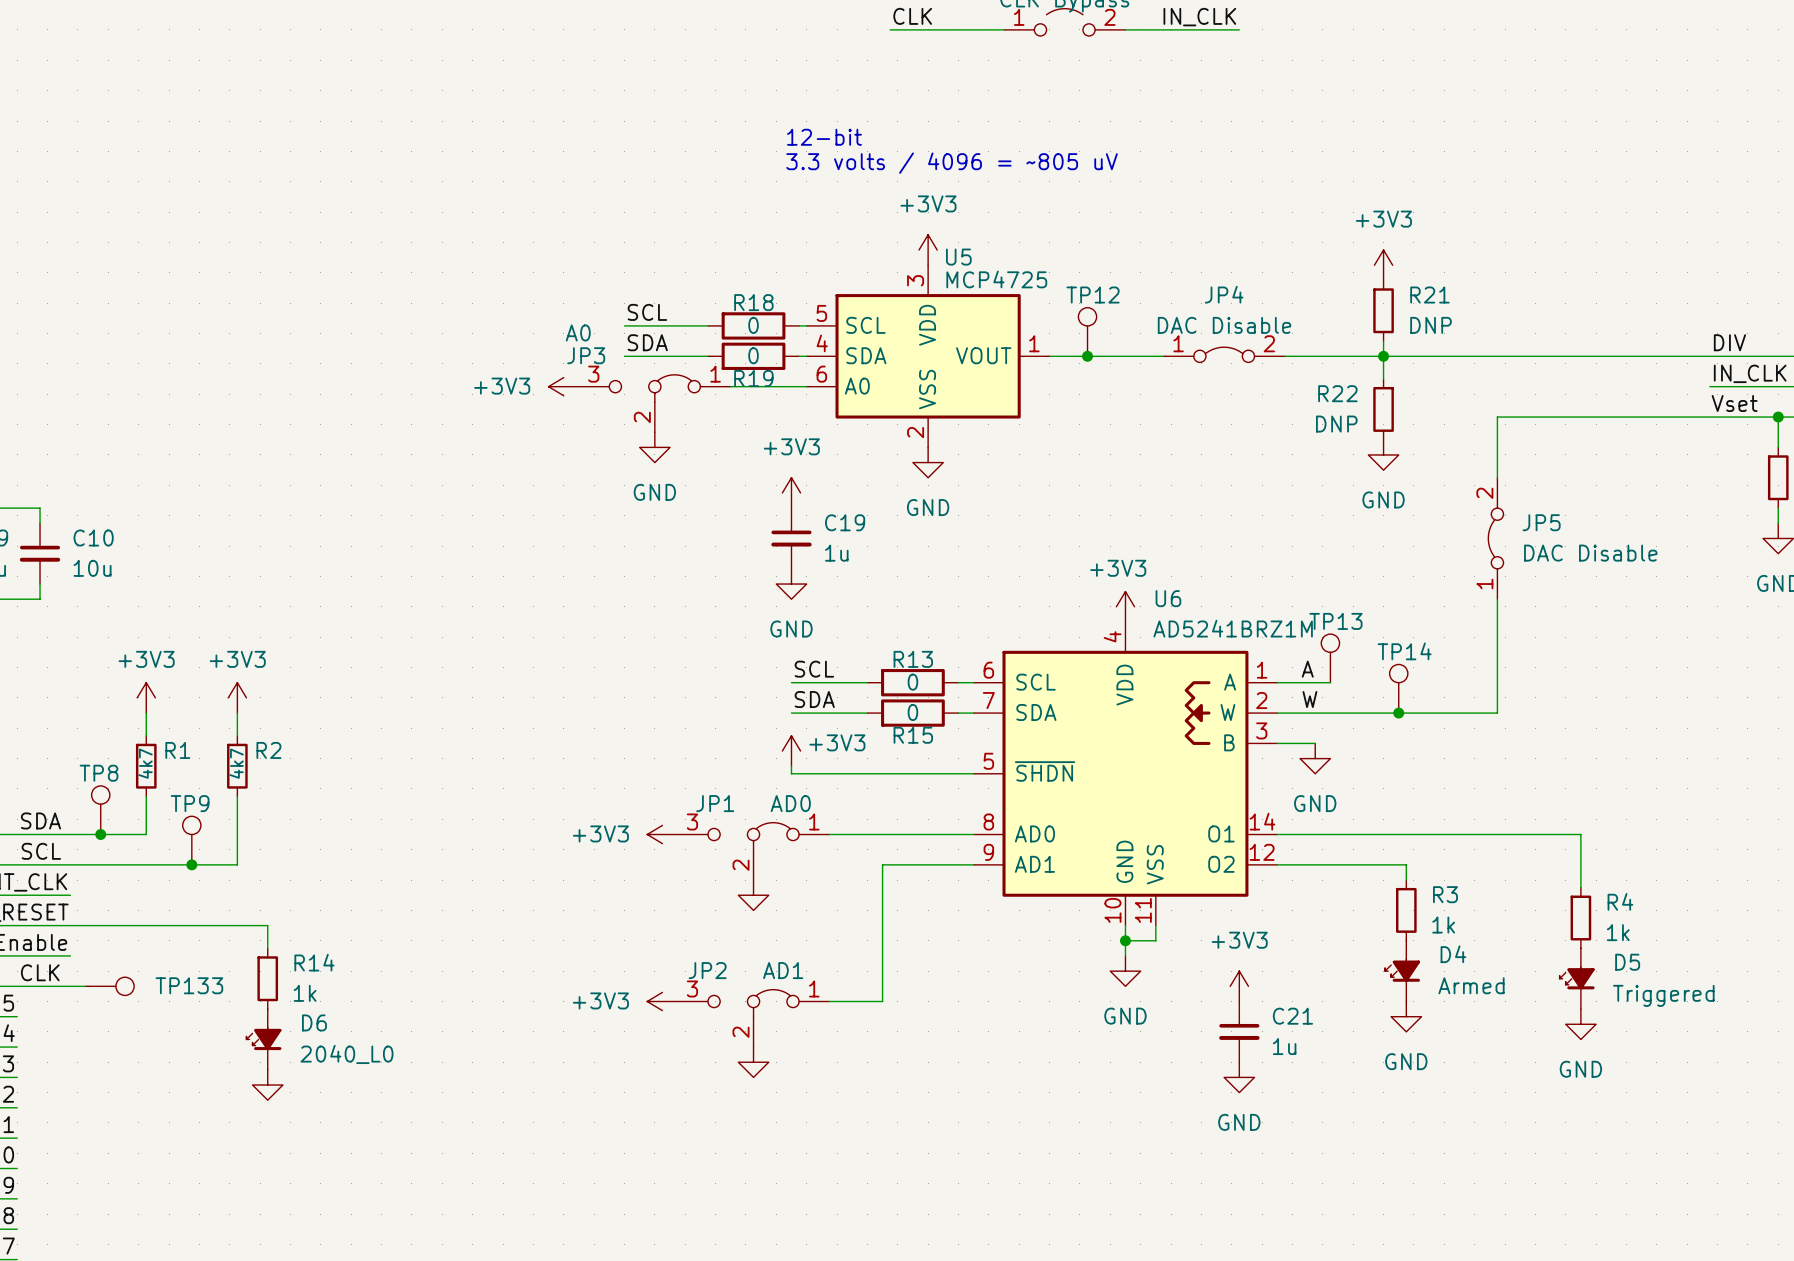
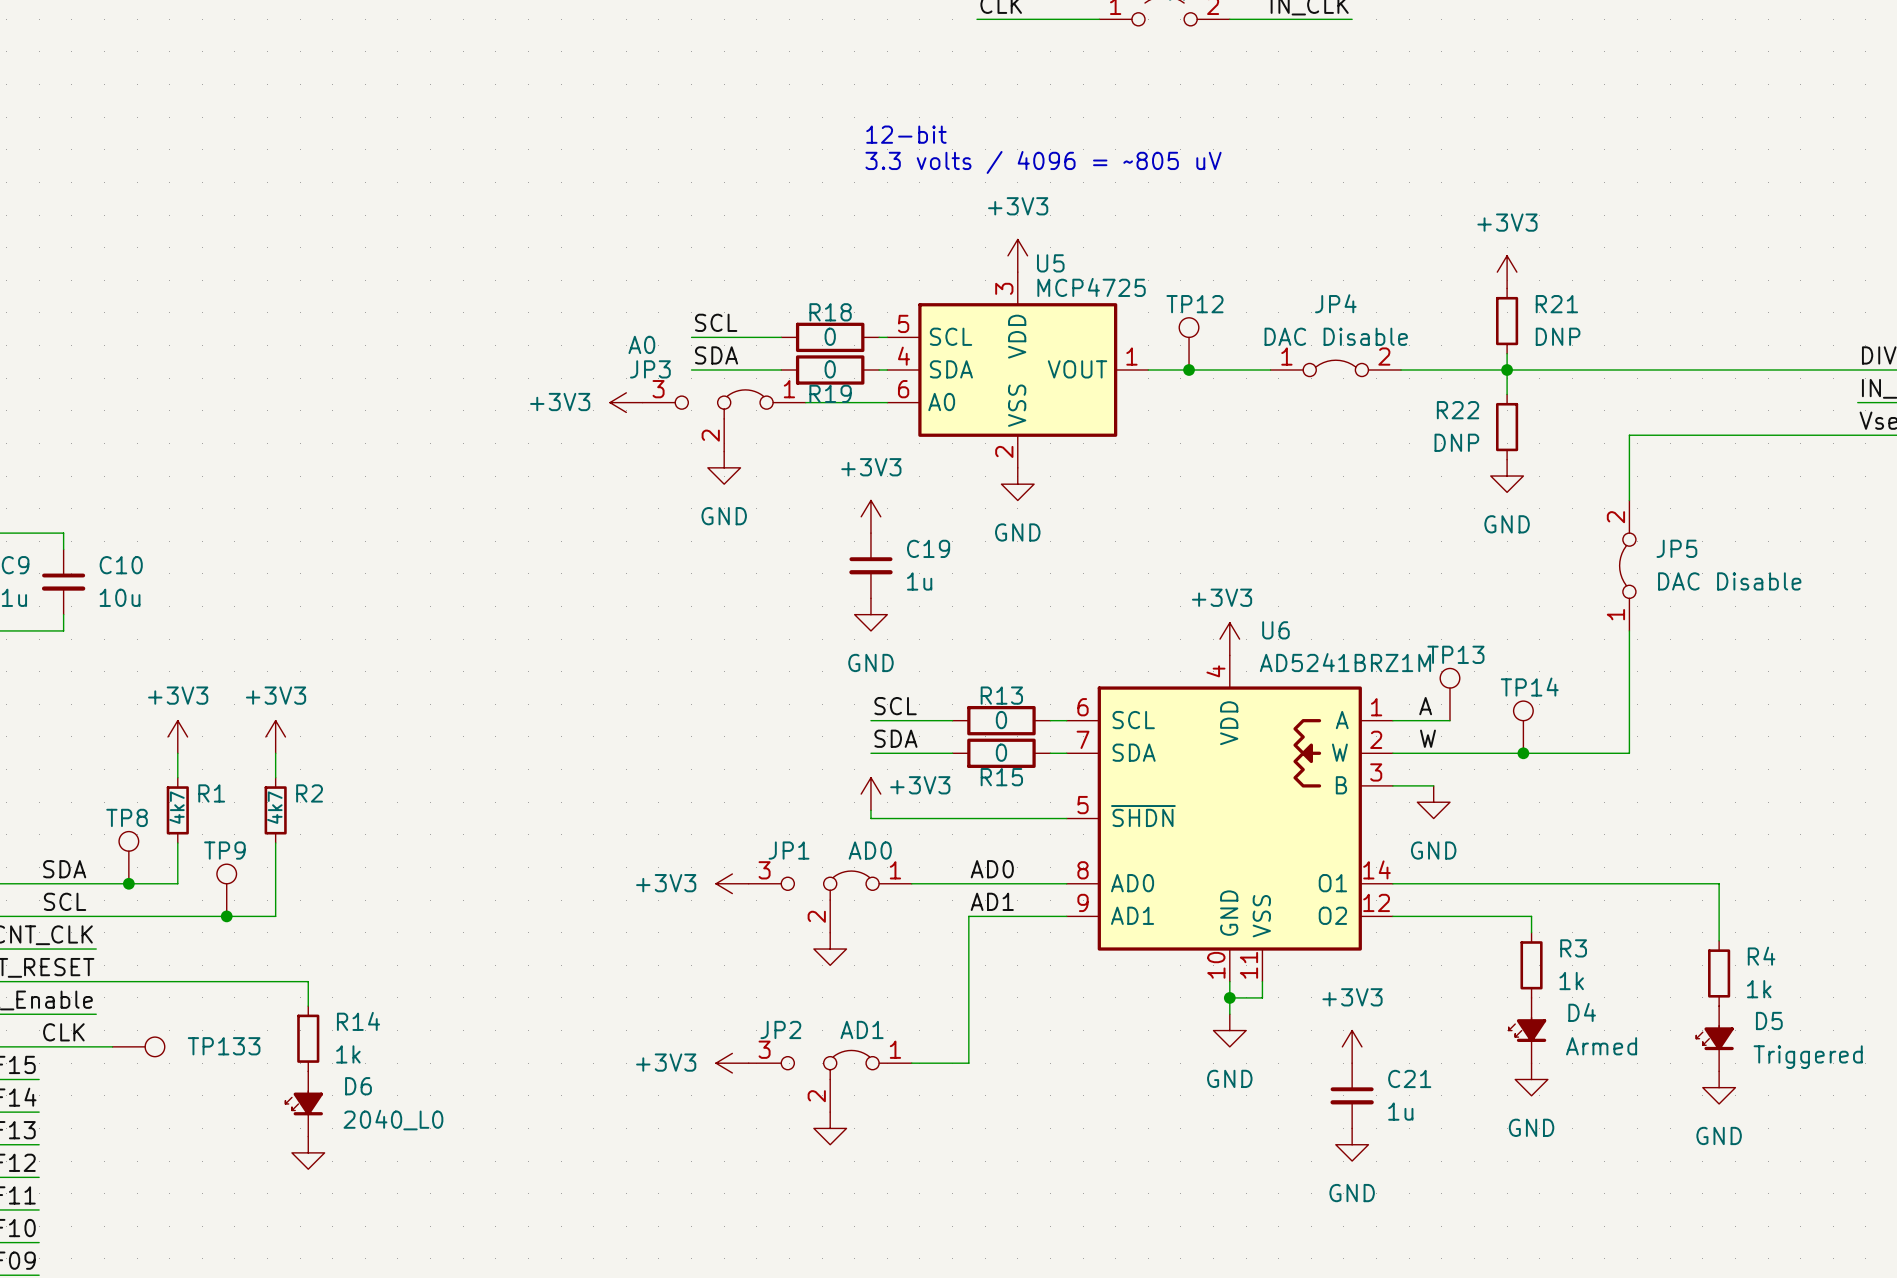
label: none -> AD0 (992, 869)
label: none -> AD1 (992, 901)

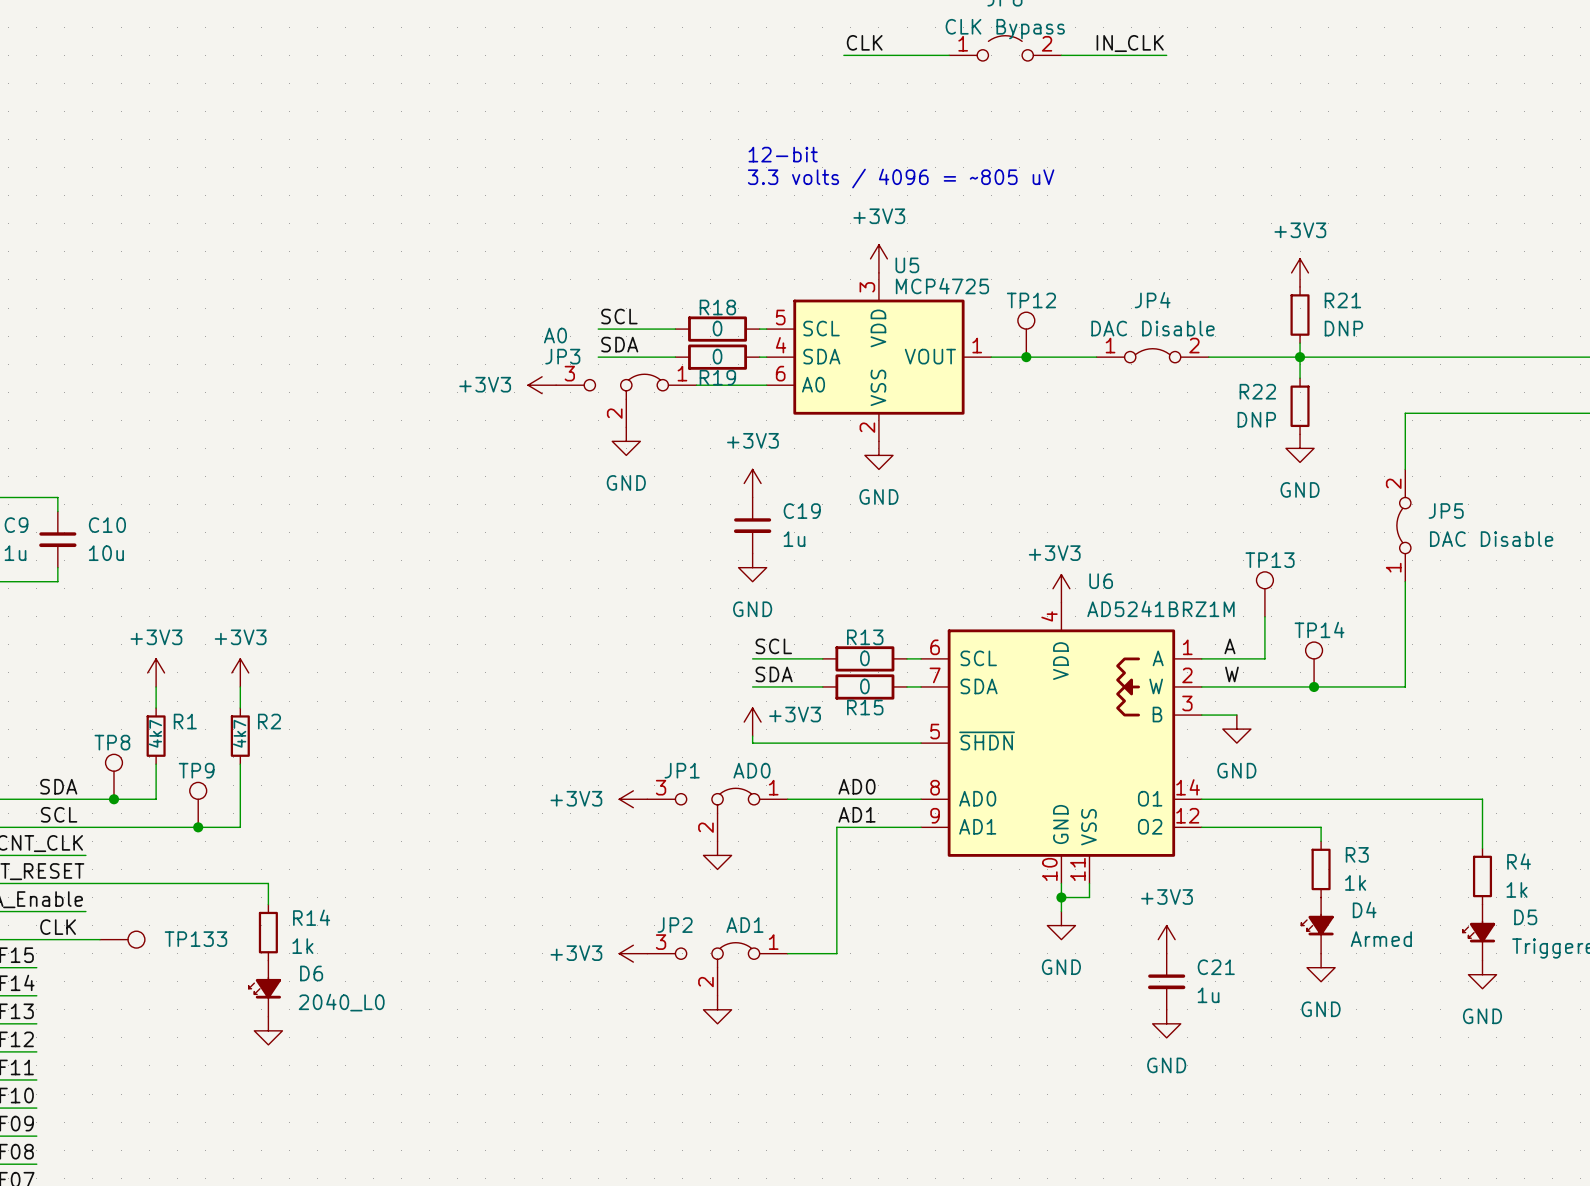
wire: none -> (1264, 616) (1264, 658) (1250, 658)
TP13 position: (1449, 694) -> (1264, 594)

